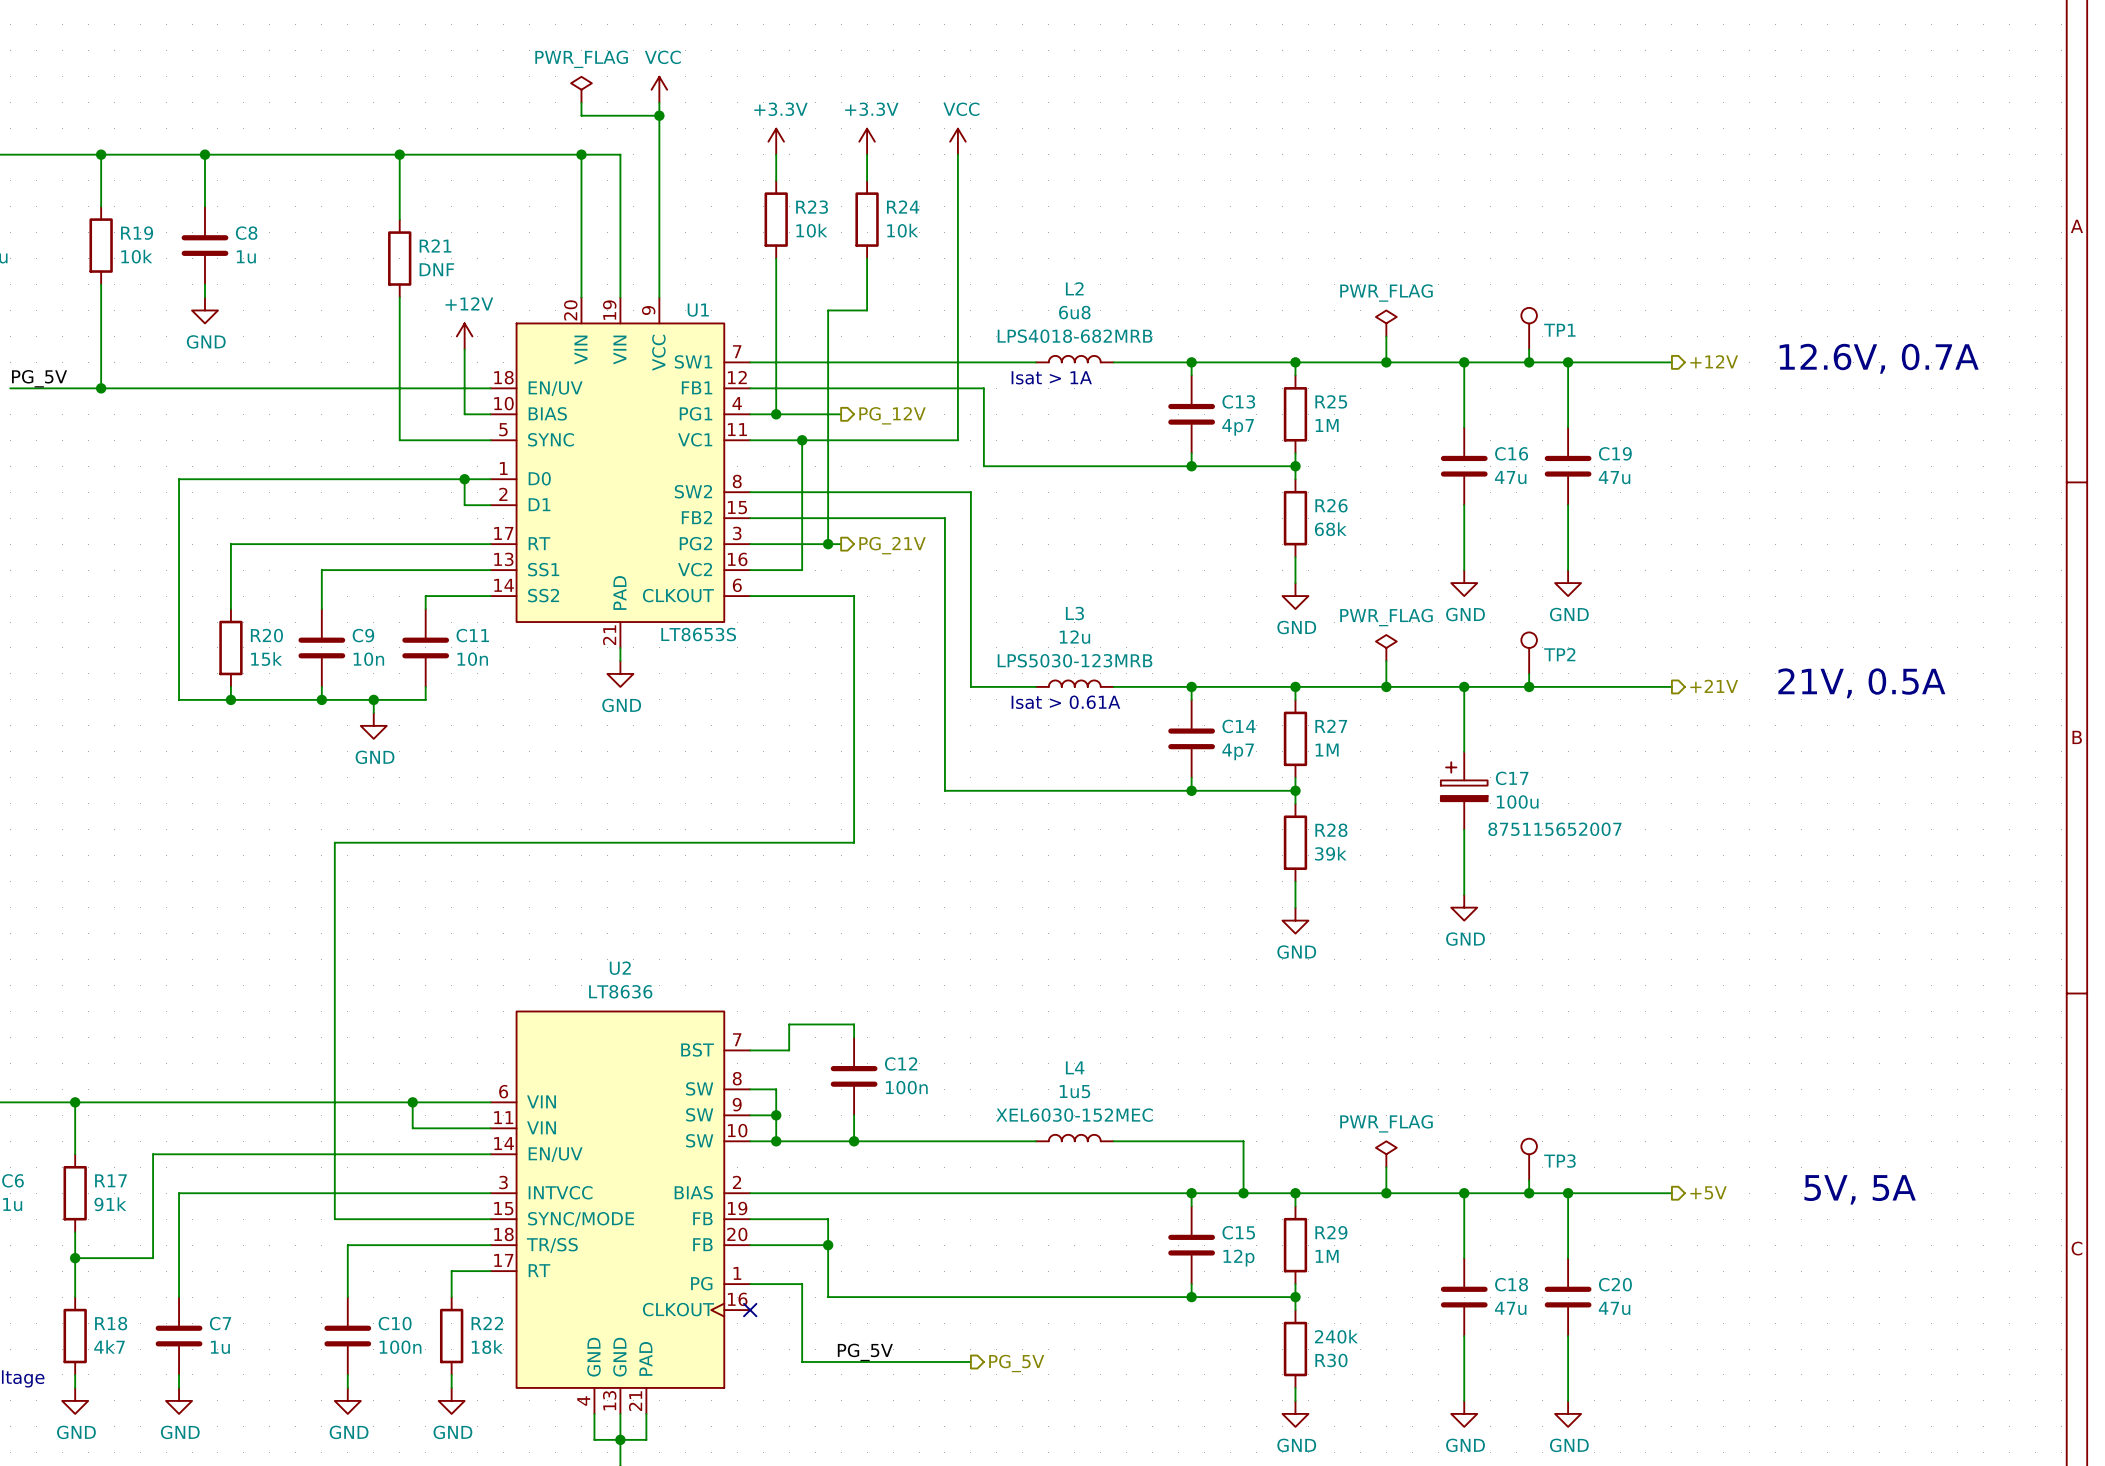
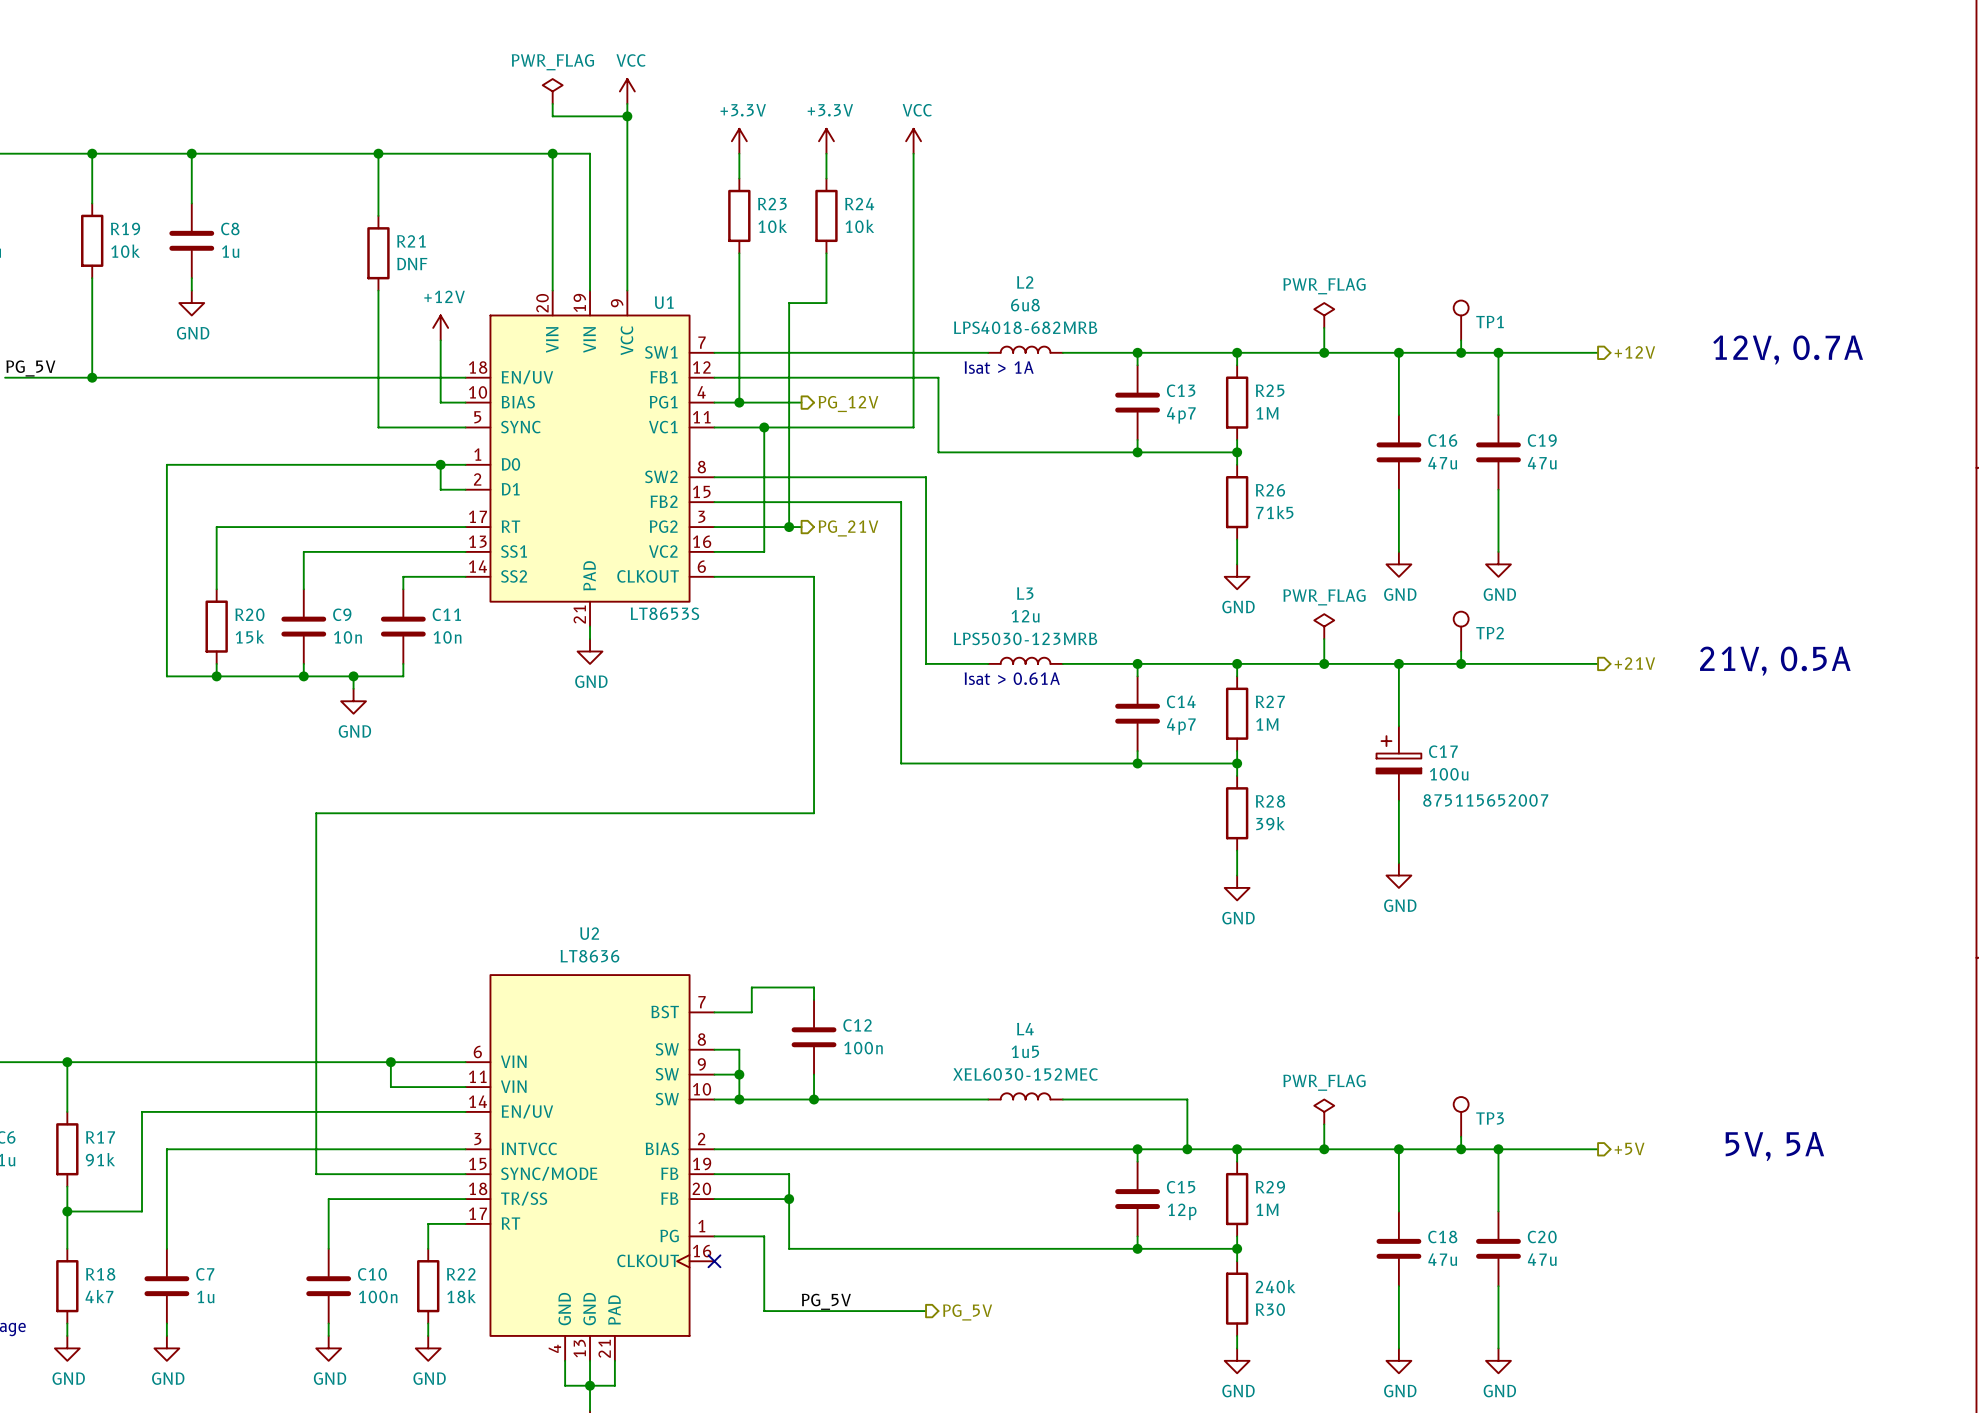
text: 12.6V, 0.7A (1879, 358) -> 12V, 0.7A (1788, 350)
R26 value: 68k (1330, 529) -> 71k5 (1274, 512)

